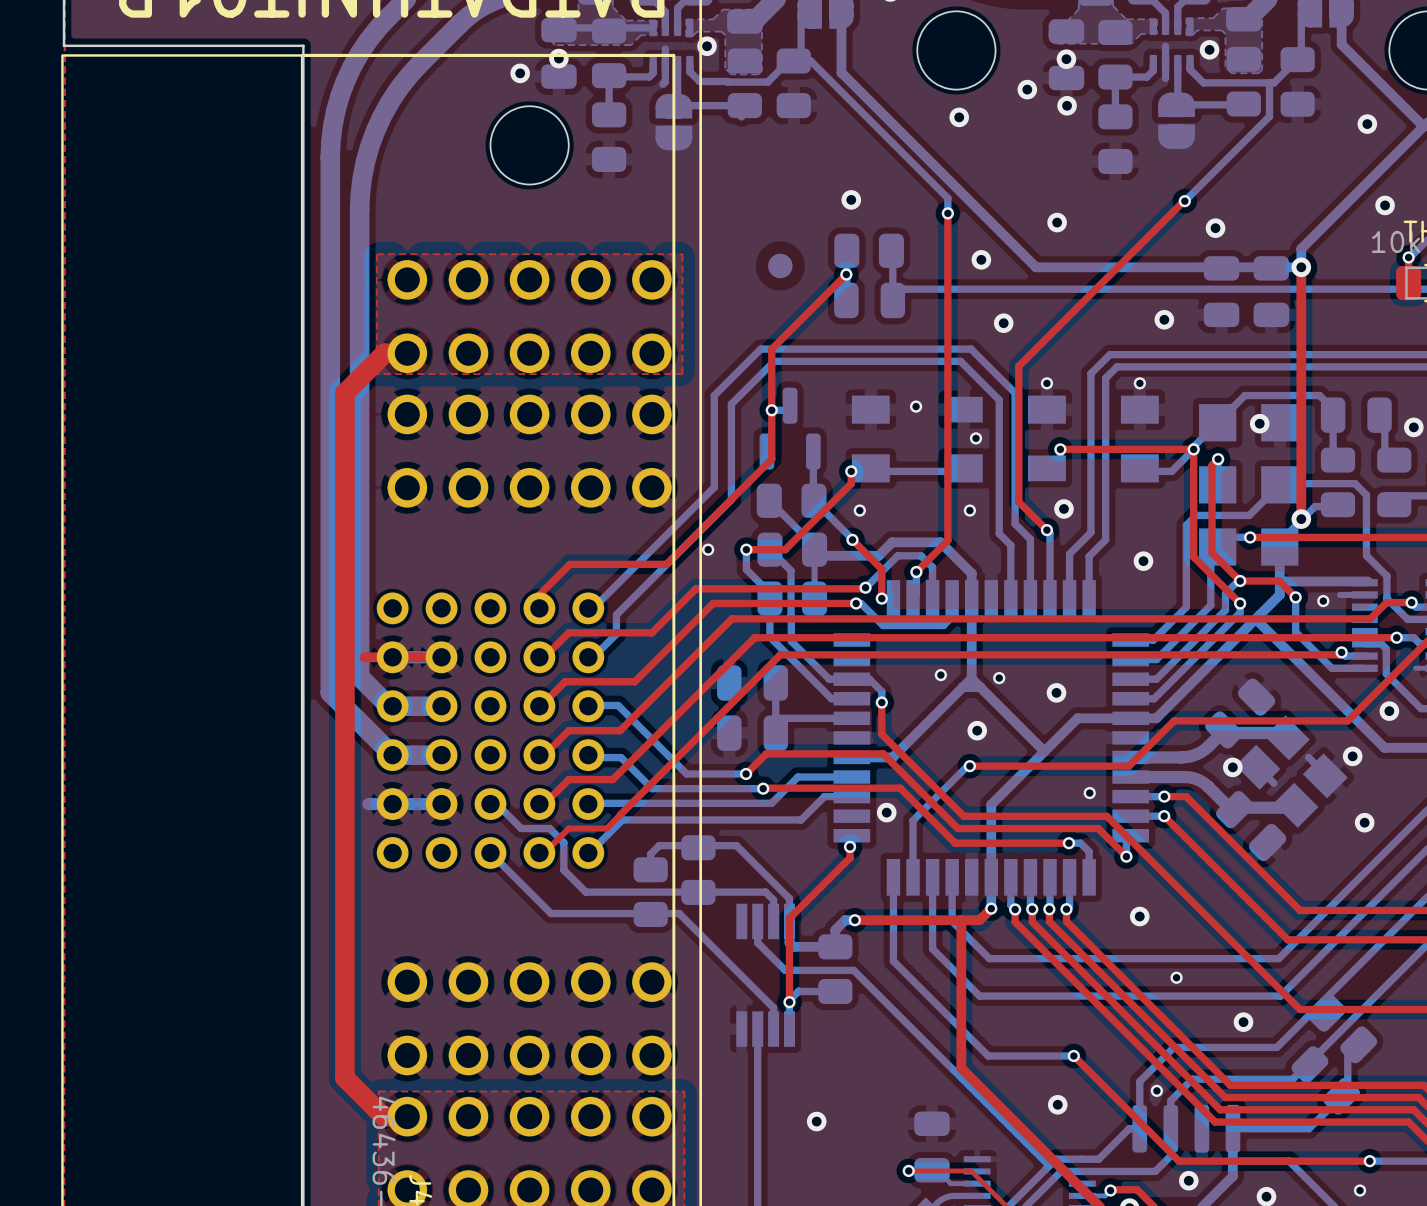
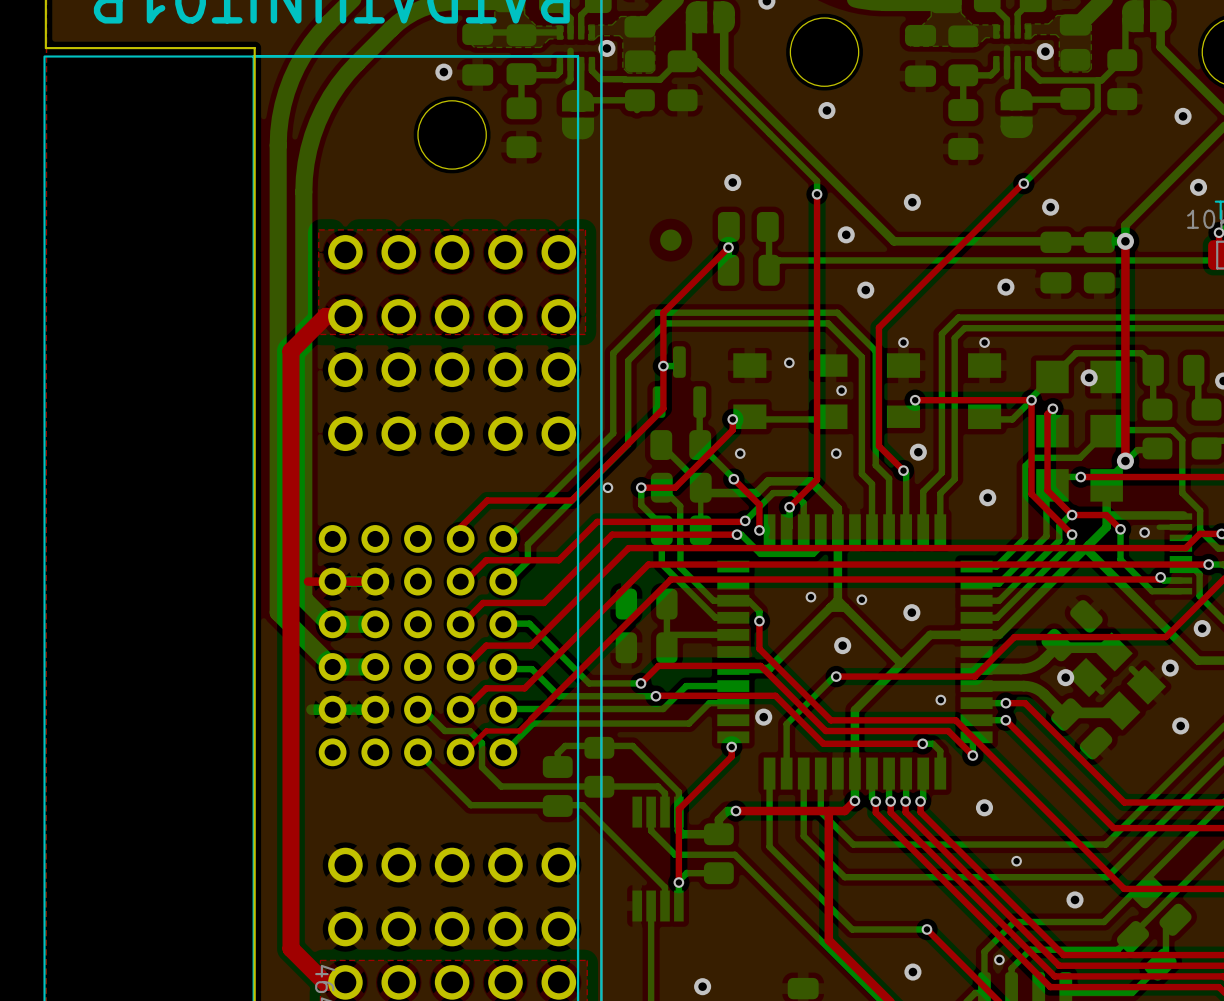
via: (558, 58) -> none
via: (1066, 59) -> none
via: (1027, 89) -> none
via: (1067, 105) -> none

